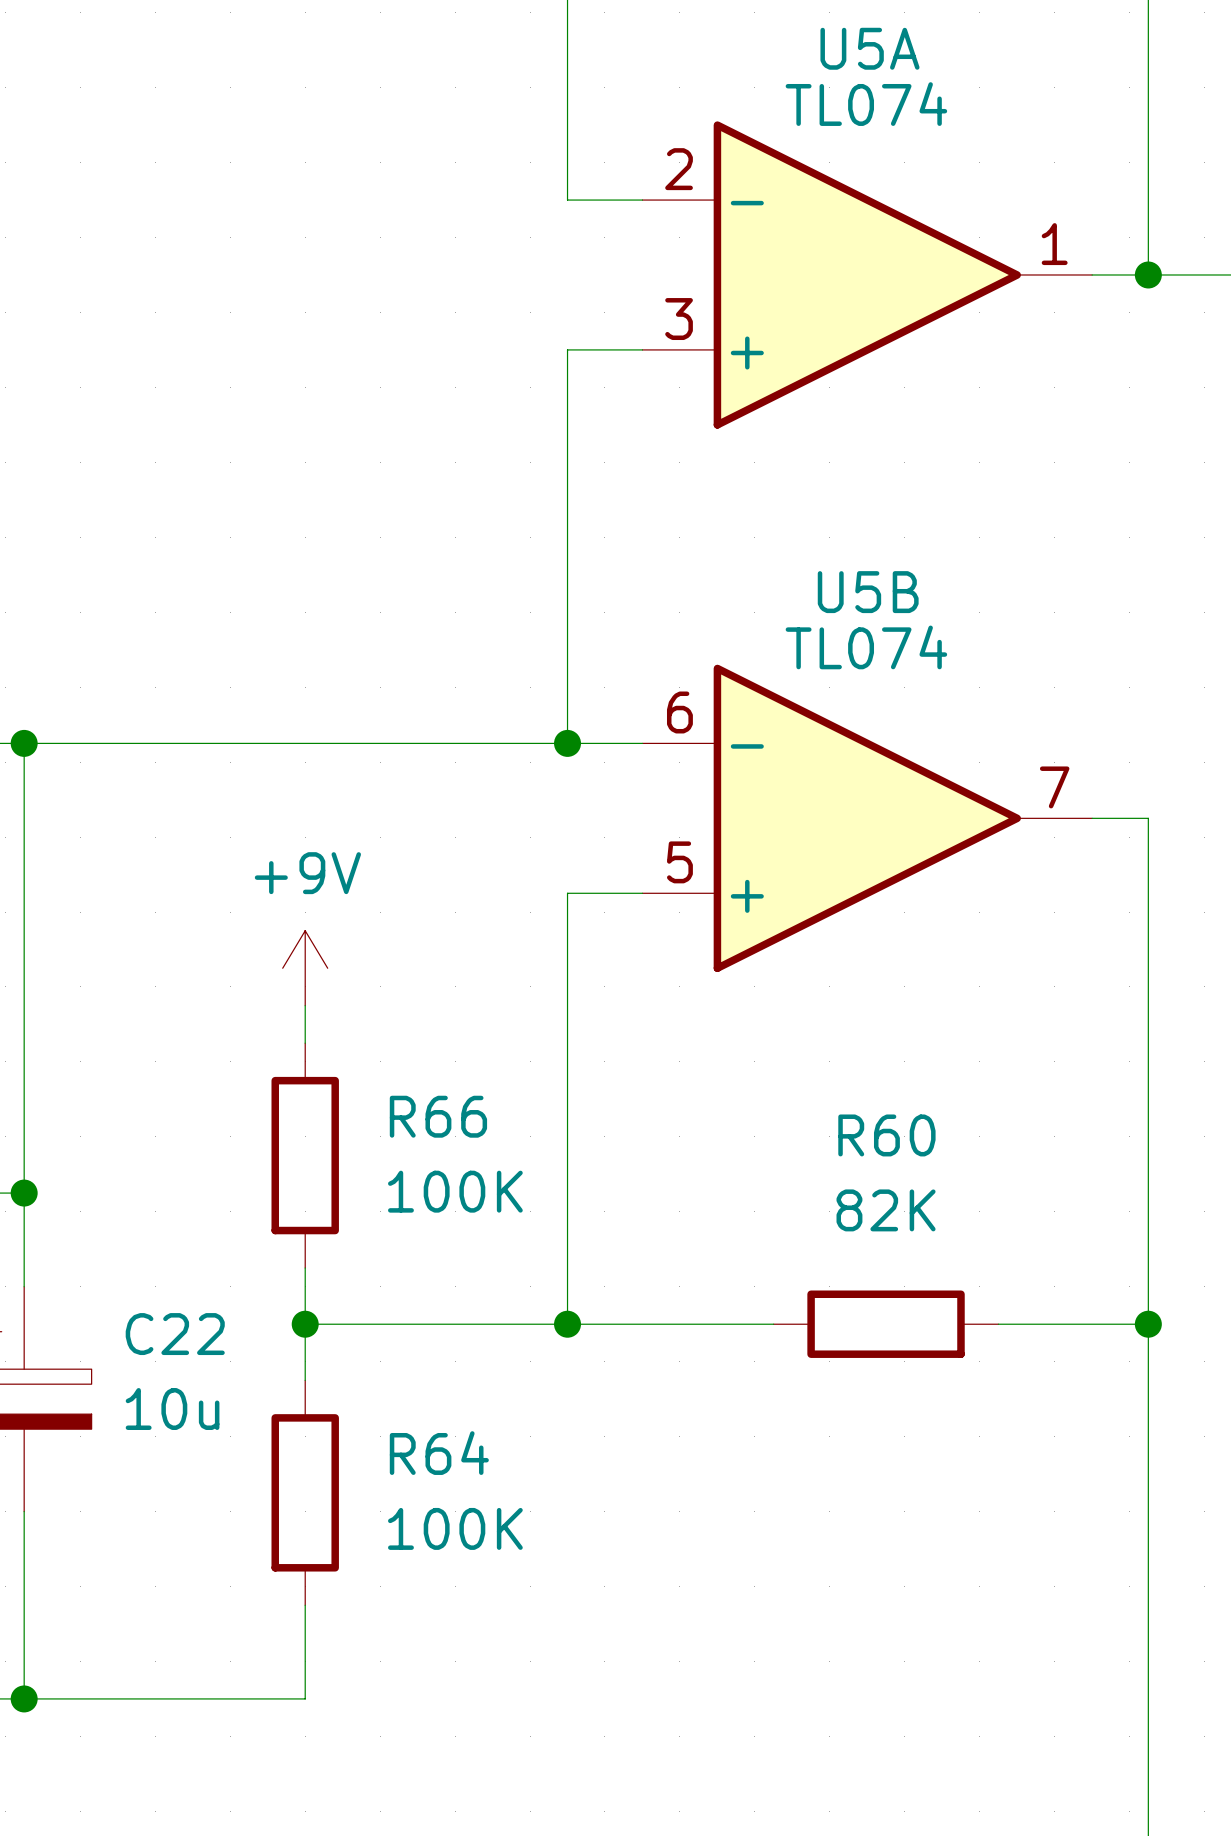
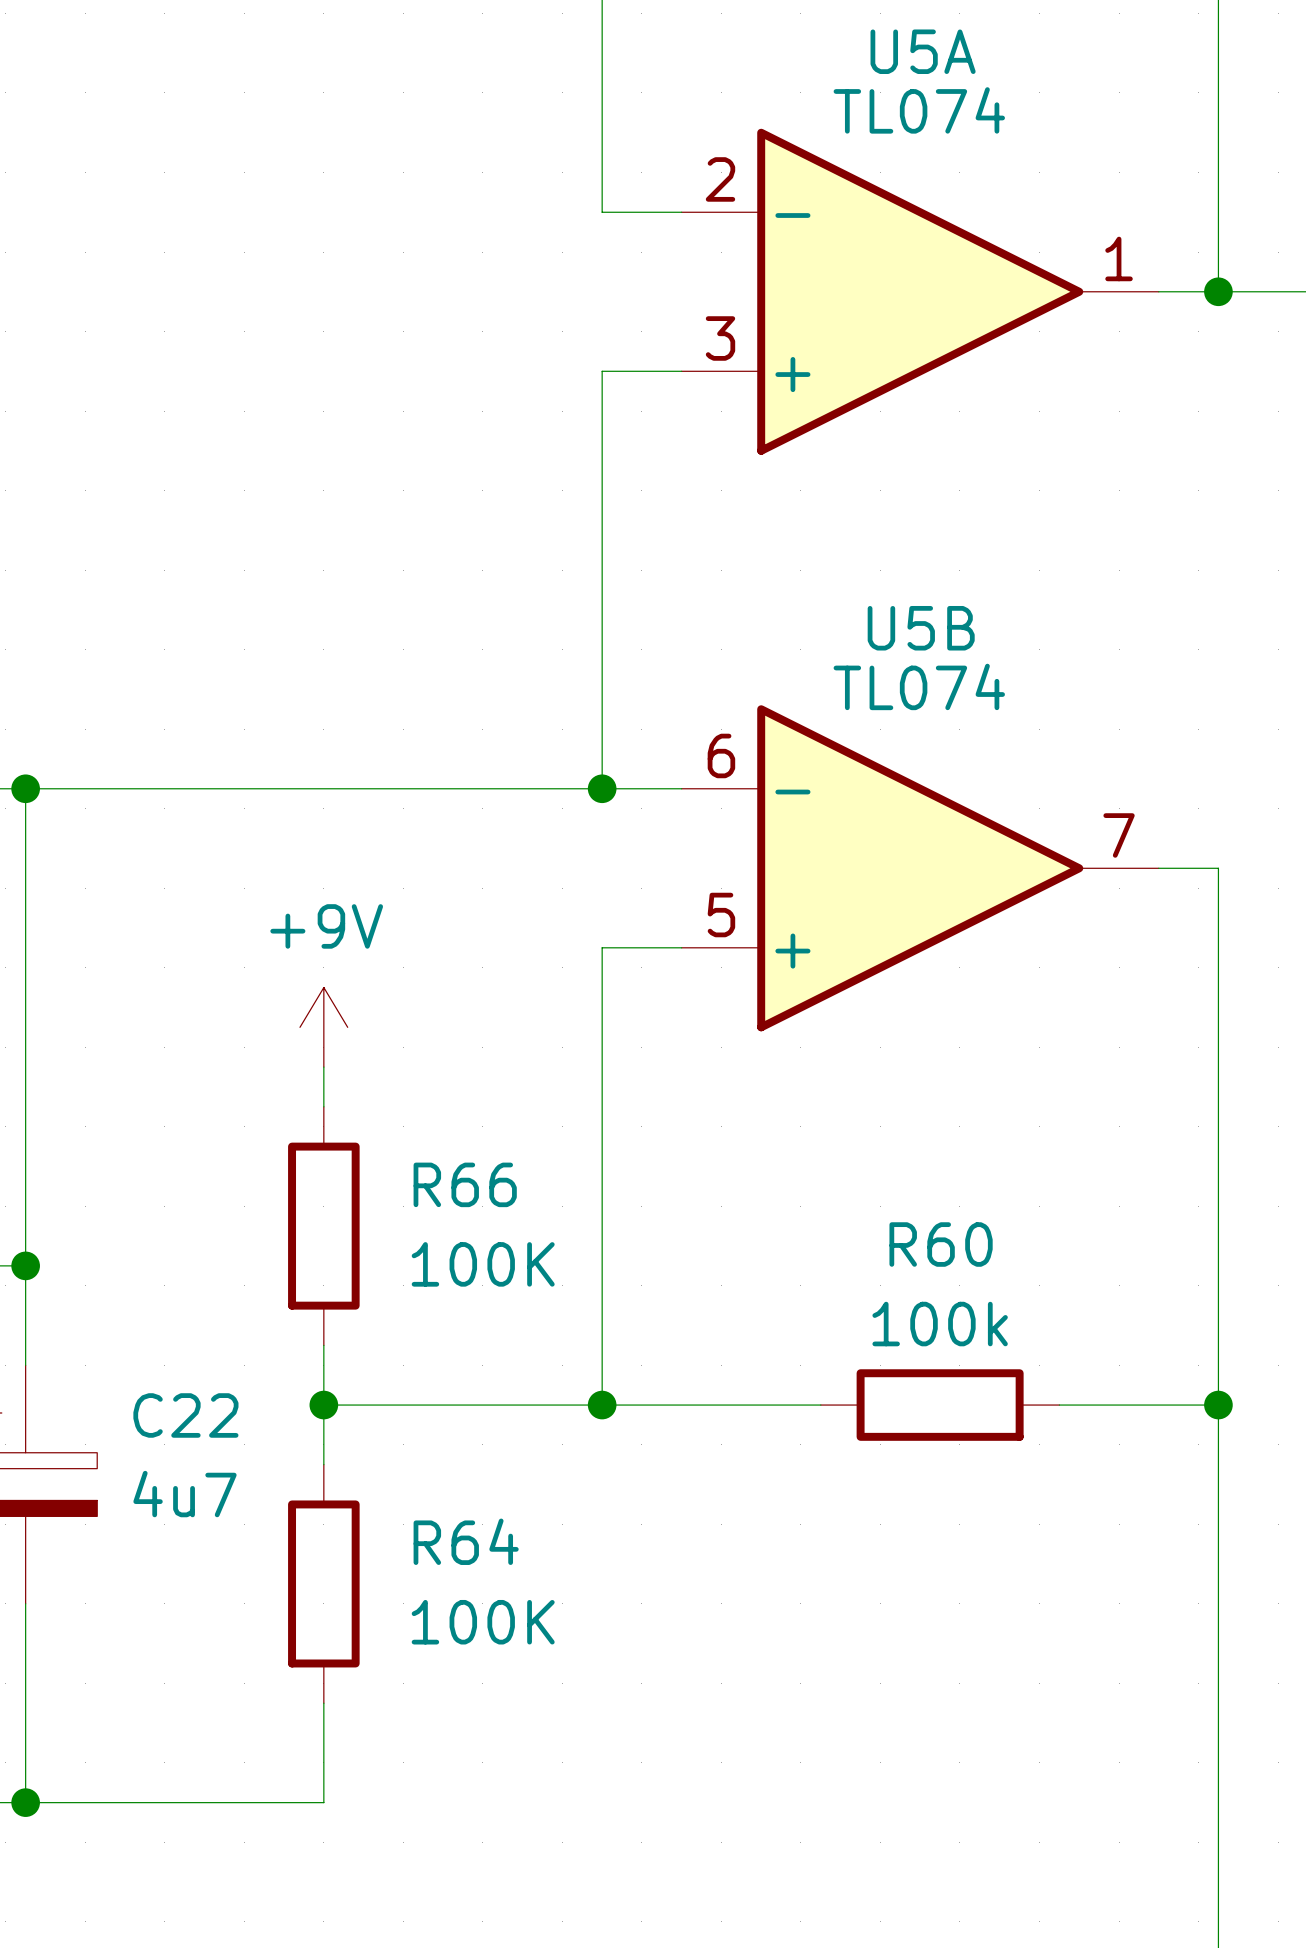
R60 name position: R60 (886, 1135) -> R60 (941, 1244)
R60 value: 82K (886, 1210) -> 100k (940, 1324)
C22 value: 10u (172, 1409) -> 4u7 (184, 1494)

